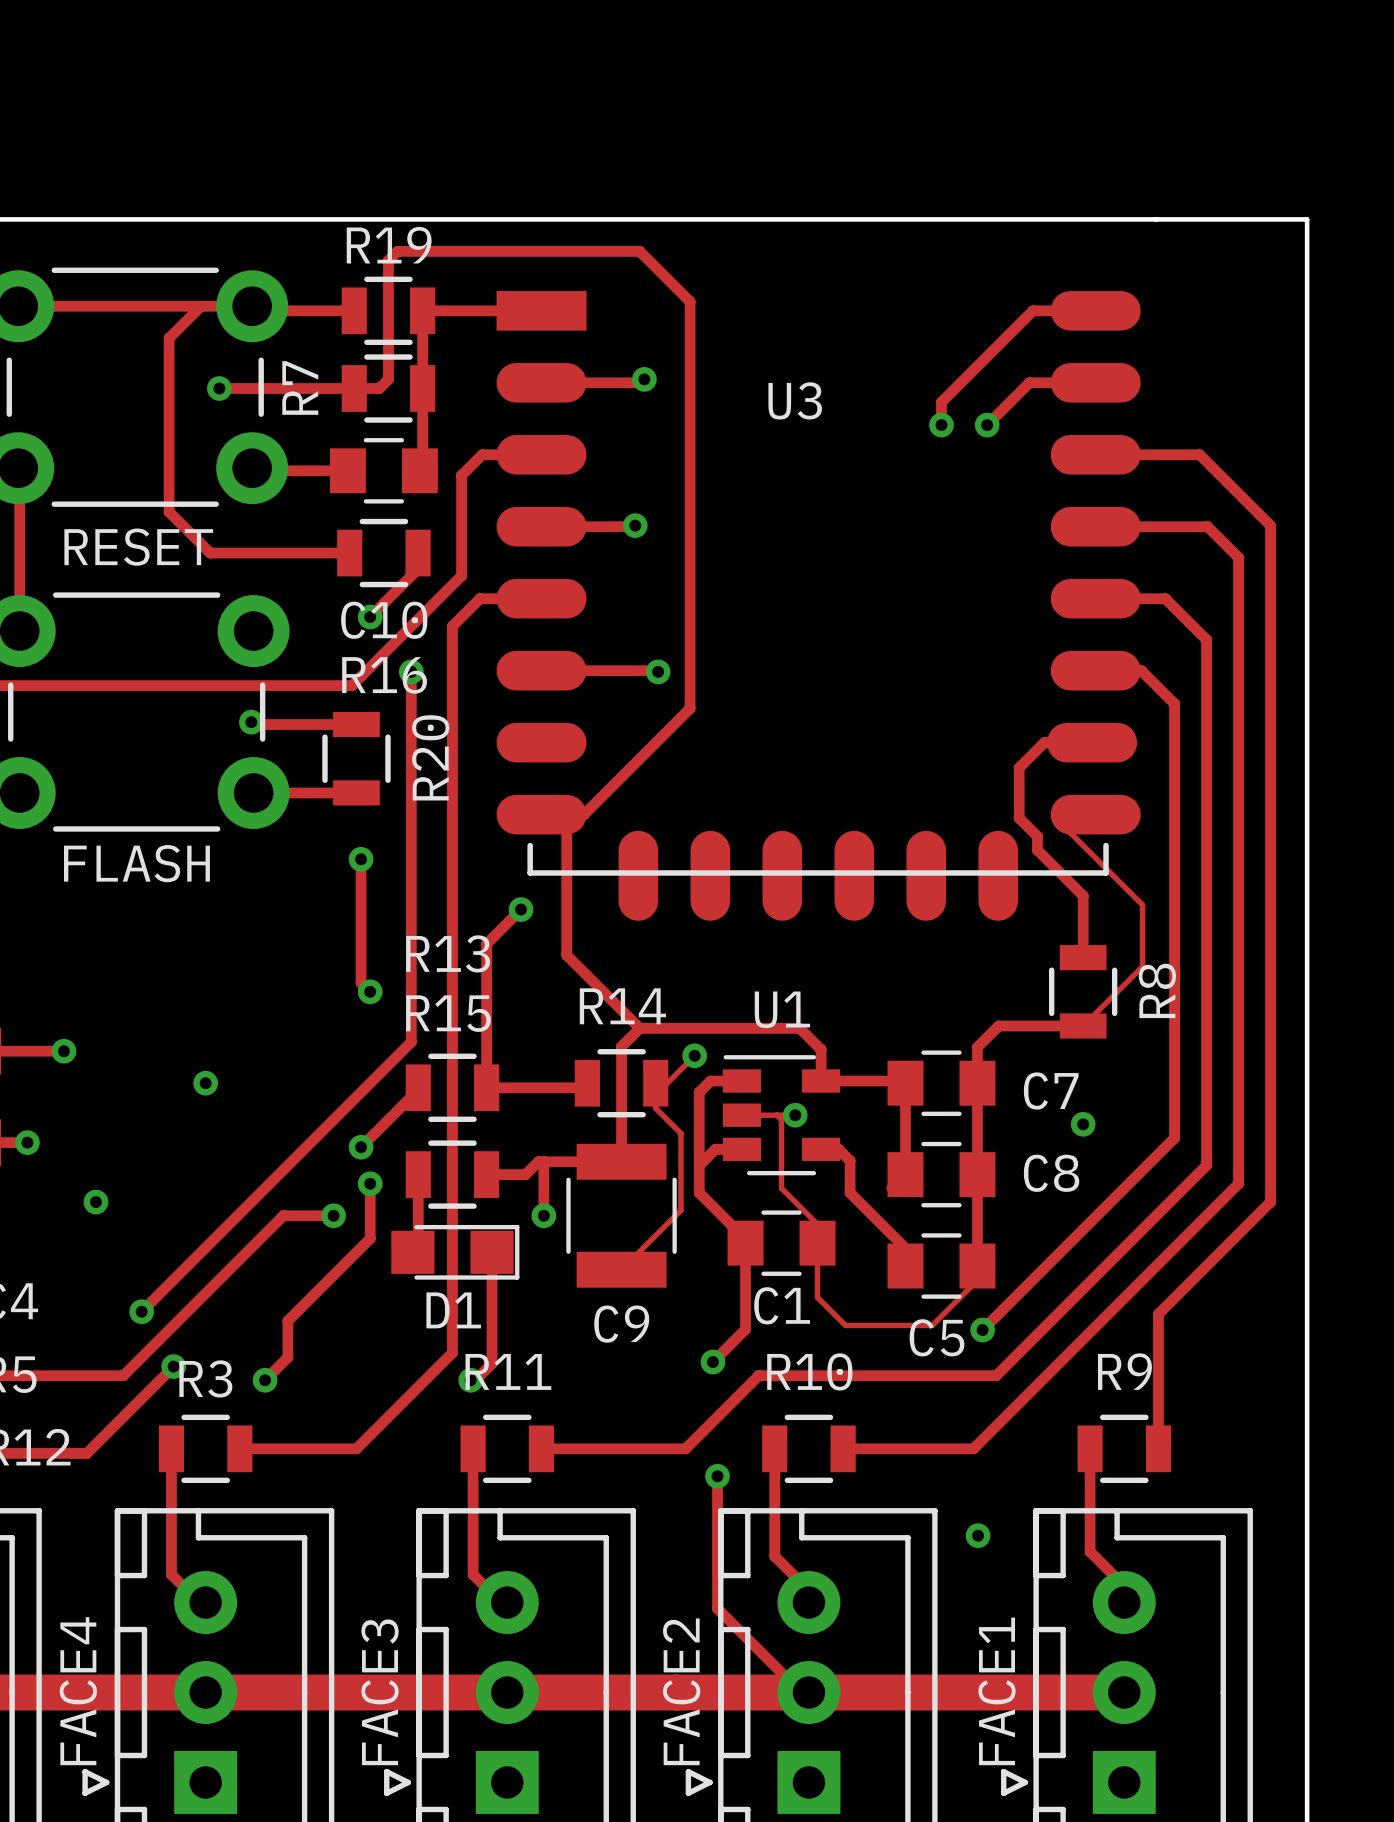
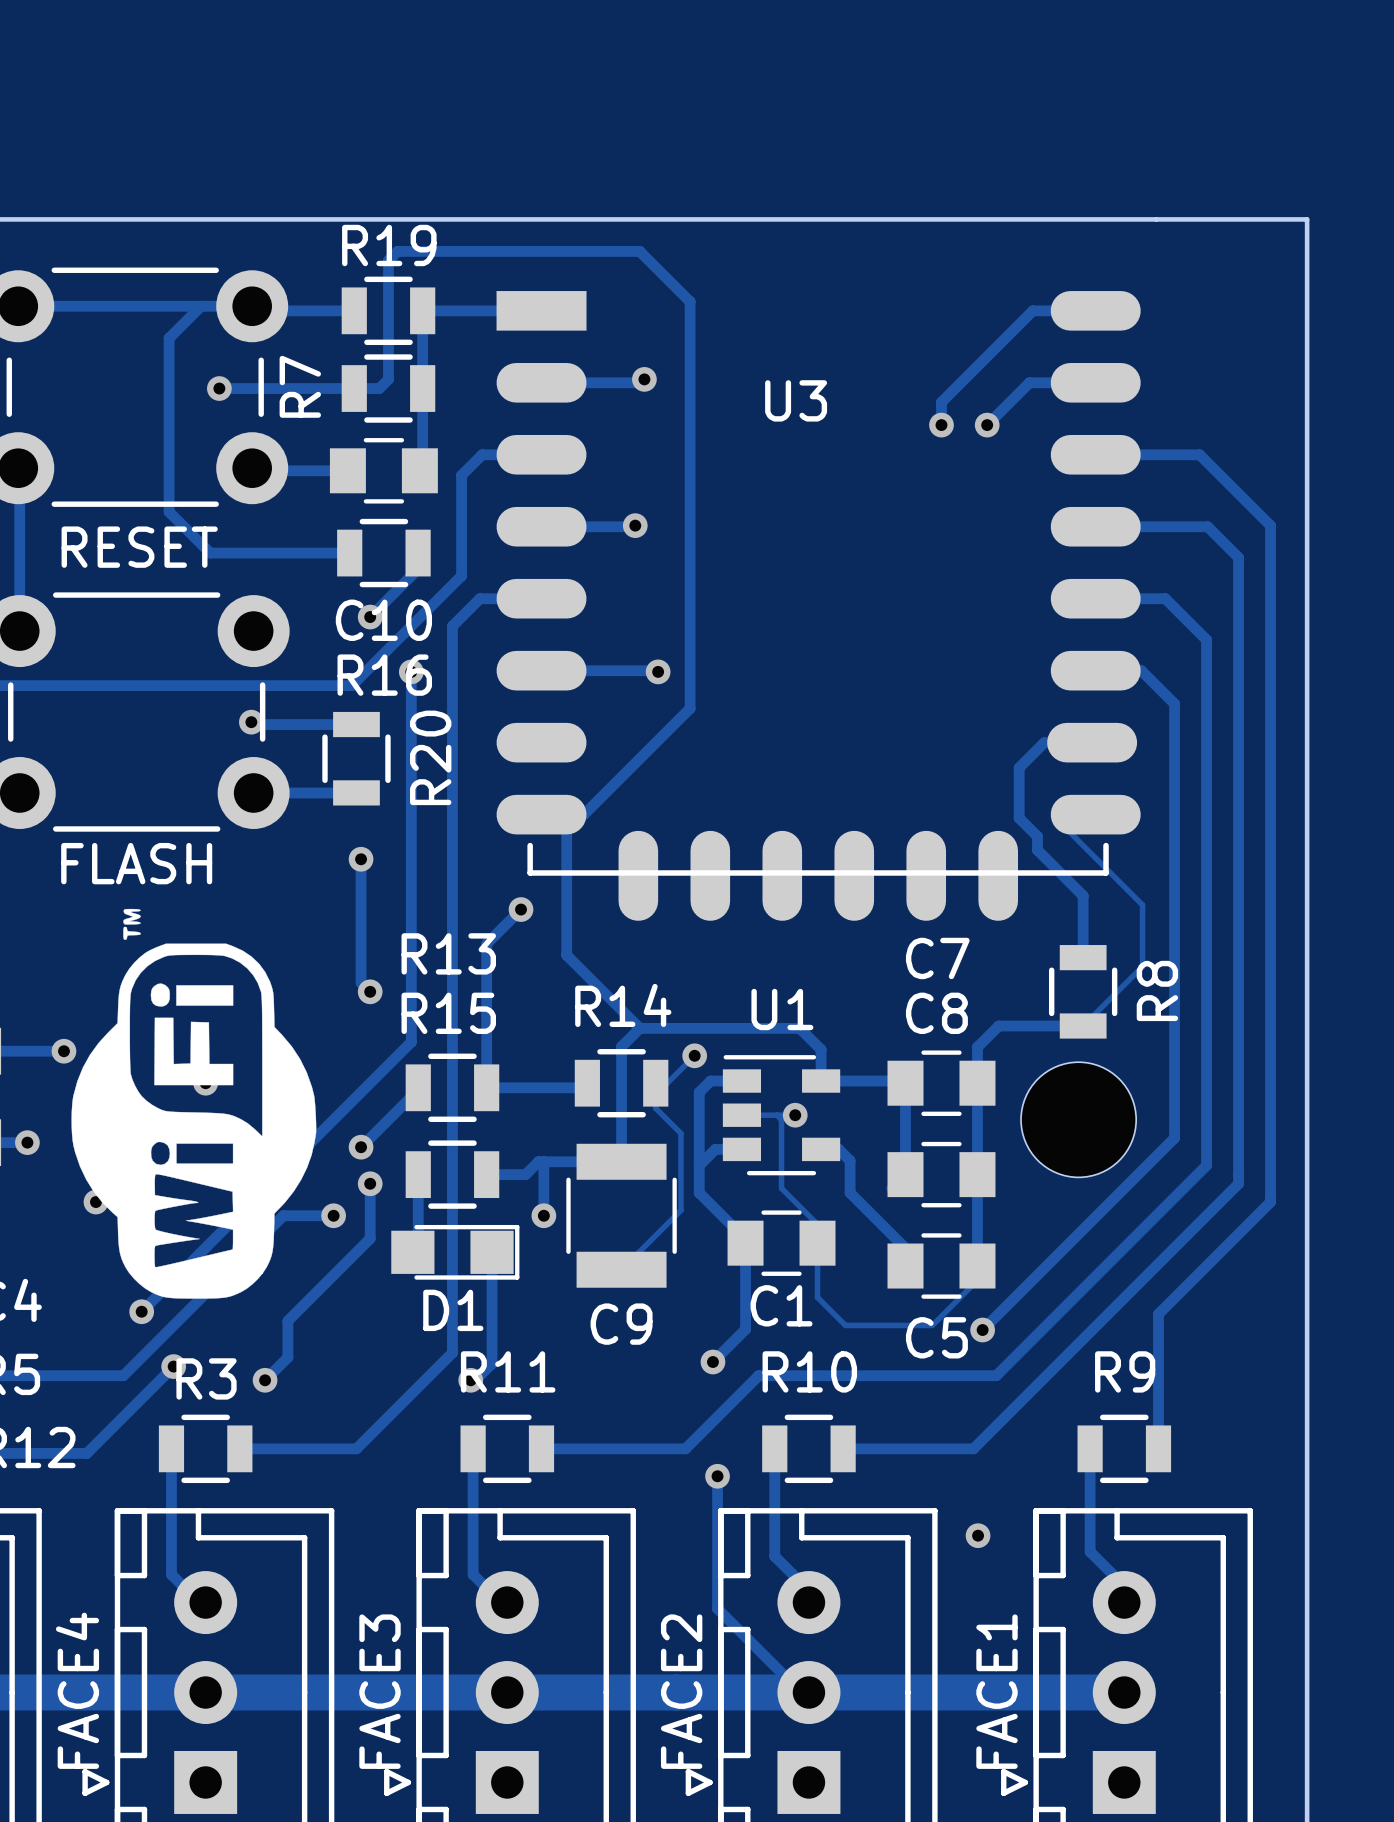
drawing: none -> [71, 908, 317, 1299]
C7 name position: C7 (1051, 1091) -> C7 (937, 958)
part: none -> (1078, 1119)
via: (1083, 1124) -> none
C8 name position: C8 (1051, 1173) -> C8 (936, 1013)

